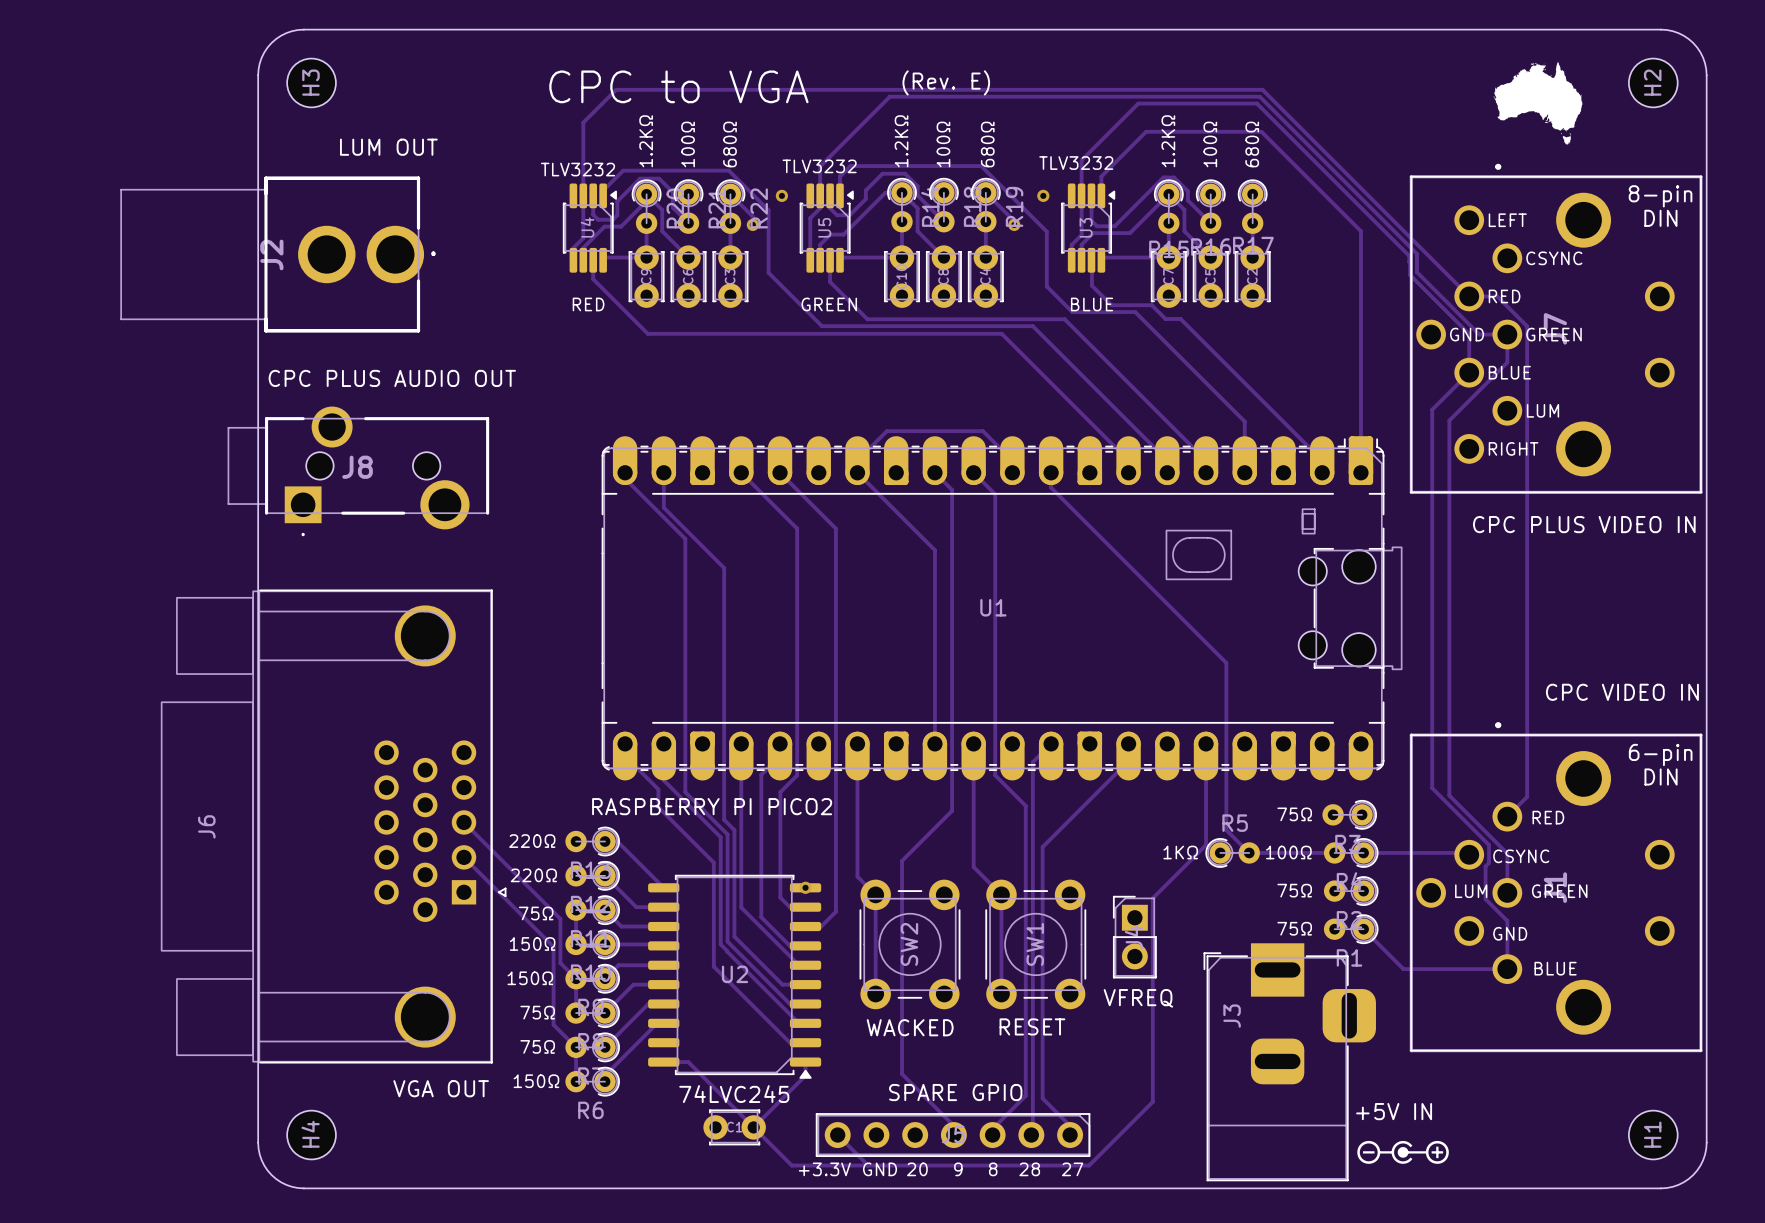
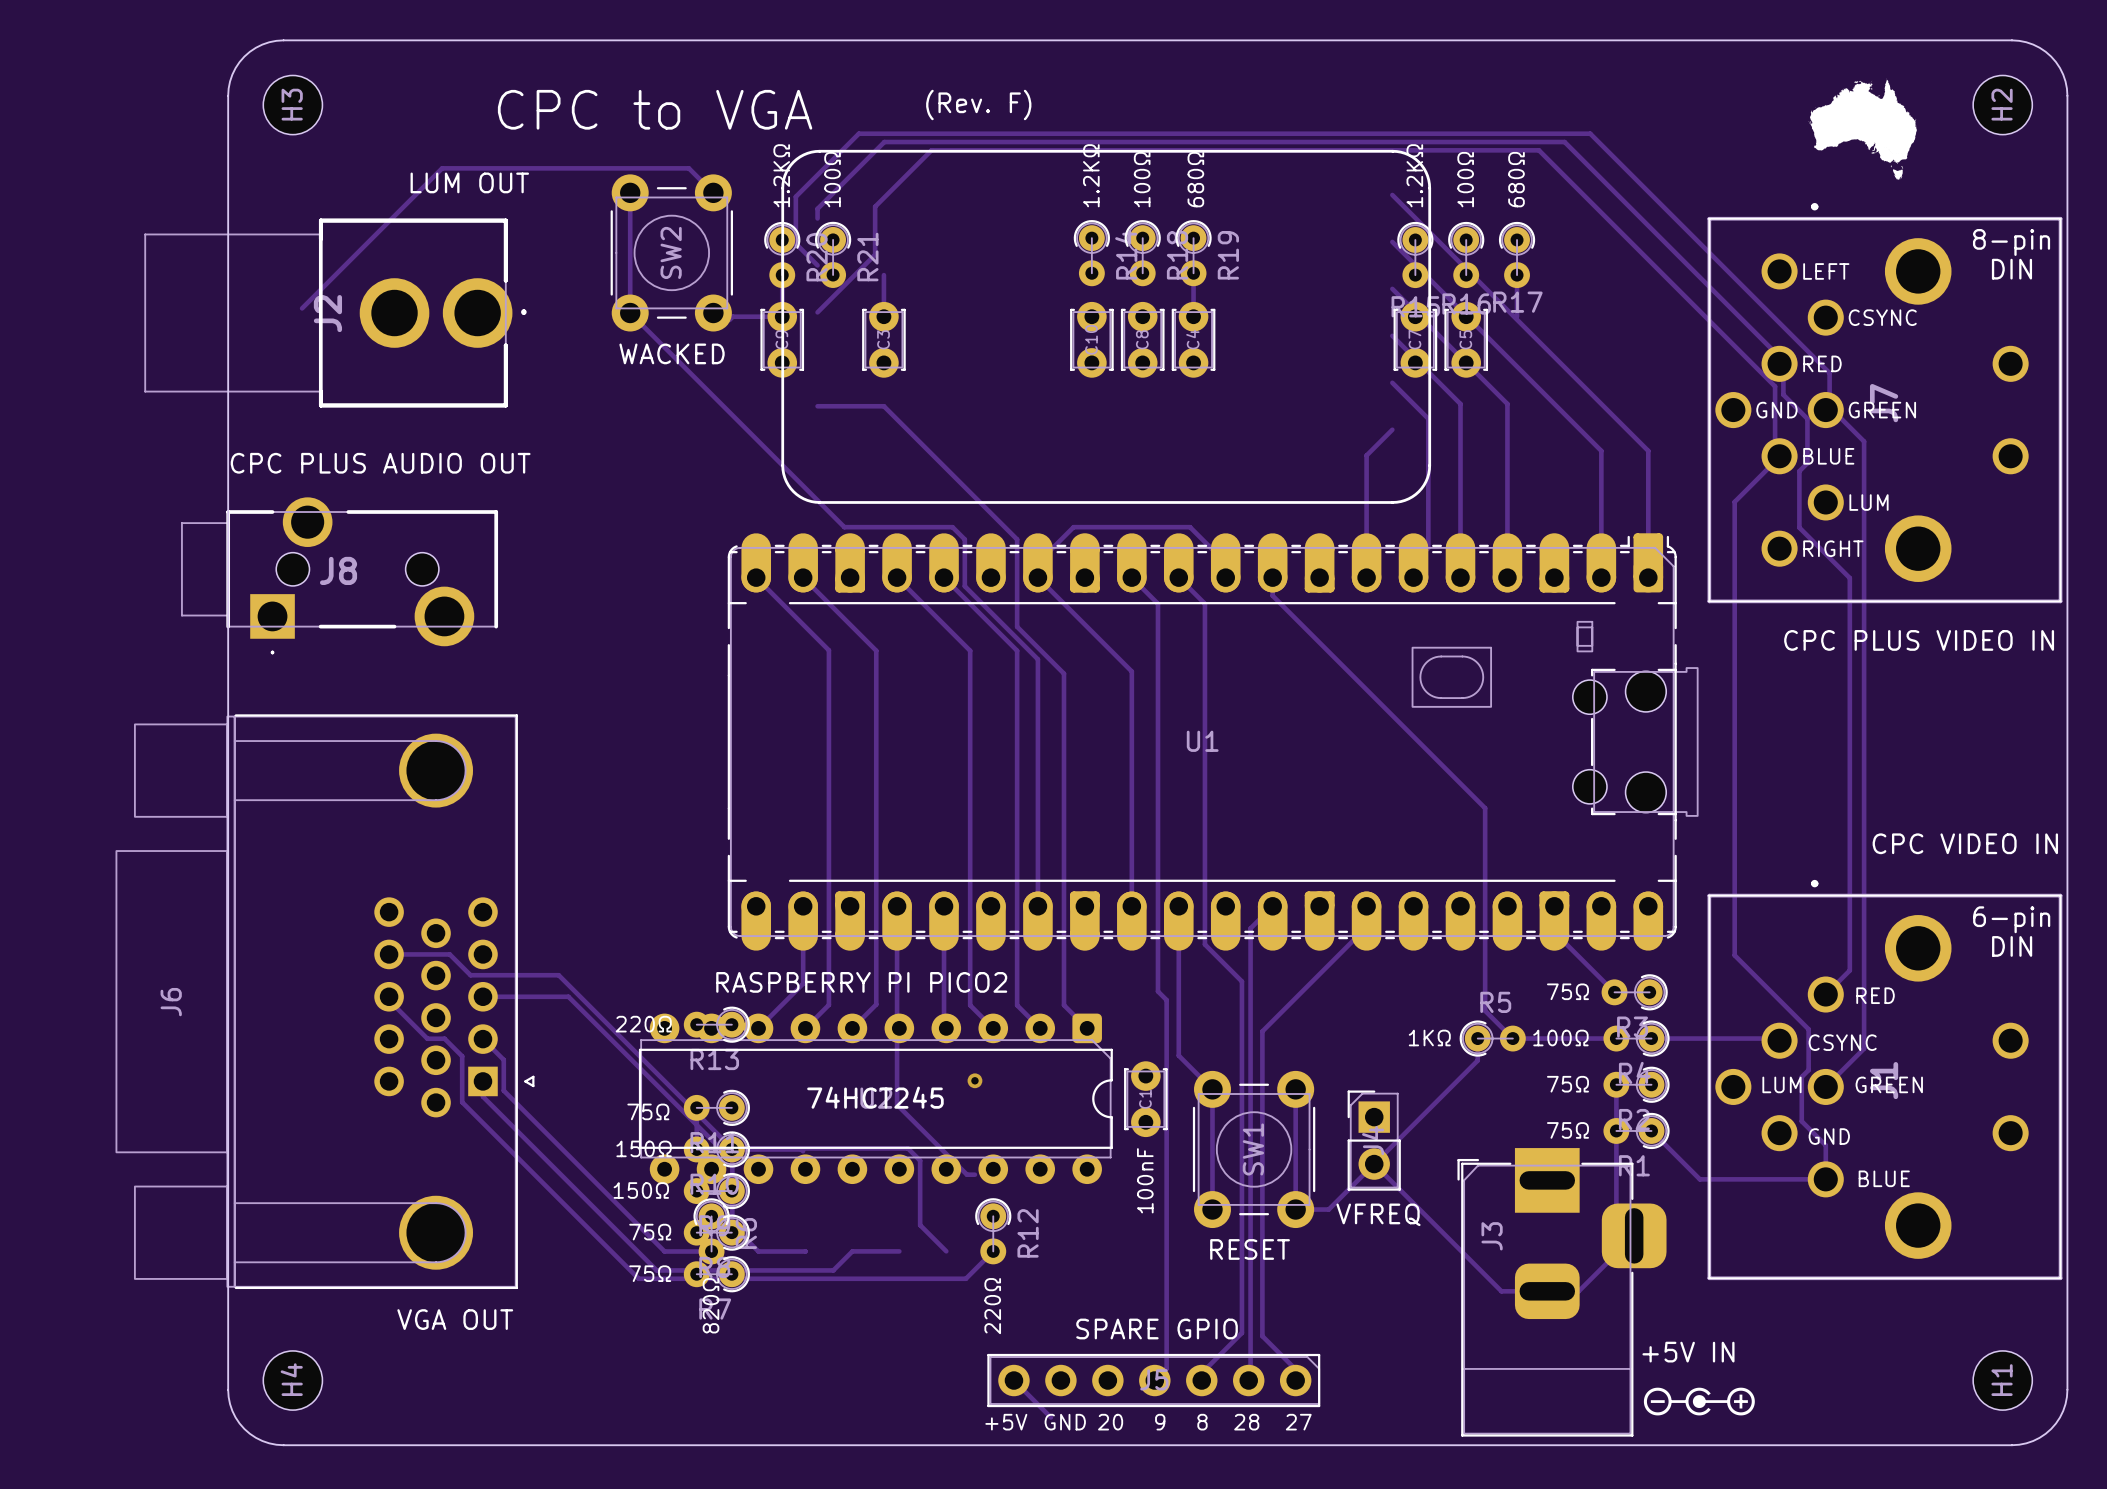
board edge: (303, 29) (286, 33) (271, 43) (261, 57) (258, 75) (258, 1142) (261, 1160) (271, 1175) (286, 1184) (303, 1188) -> (366, 40) (283, 40) (262, 44) (249, 51) (235, 68) (230, 81) (228, 95) (228, 1397) (232, 1410) (239, 1423) (249, 1433) (262, 1441) (283, 1445) (366, 1445)
H3 position: (311, 82) -> (292, 105)
text: none -> (Rev. F) (978, 104)
text: (Rev. E) (946, 82) -> none
text position: CPC to VGA (678, 86) -> CPC to VGA (655, 109)
line: none -> (819, 151) (1392, 151) (1408, 154) (1424, 168) (1429, 188) (1429, 465) (1426, 481) (1412, 496) (1392, 502) (819, 502) (803, 498) (790, 488) (782, 469) (782, 188) (786, 172) (793, 162) (807, 153) (819, 151)
track: none -> (713, 192) (688, 168) (442, 168) (302, 308)
track: (985, 192) (1014, 221) (1014, 224) -> none
track: (730, 194) (752, 216) (752, 224) -> none
track: (593, 195) (593, 214) (598, 219) (612, 219) (617, 215) (617, 201) (640, 178) (659, 178) (672, 192) (672, 207) (688, 223) -> none
track: (603, 195) (603, 190) (623, 170) (728, 170) (768, 210) (768, 272) (821, 326) (1032, 326) (1167, 460) -> (1392, 382) (1428, 418) (1428, 548) (1413, 562)
via: (781, 195) -> none
track: (840, 195) (840, 176) (850, 166) (981, 166) (1046, 231) (1046, 286) (1072, 312) (1135, 312) (1244, 421) -> (1392, 288) (1507, 403) (1507, 515)
via: (1043, 195) -> none
track: (1091, 195) (1091, 220) (1096, 226) (1114, 226) (1163, 177) (1174, 177) (1187, 191) (1187, 200) (1210, 223) -> none
track: (1101, 195) (1101, 176) (1146, 131) (1261, 131) (1360, 231) (1360, 368) -> (1392, 194) (1648, 450)
track: (830, 196) (830, 208) (837, 215) (849, 215) (865, 199) (865, 190) (882, 173) (905, 173) (917, 186) (917, 195) (943, 221) -> none
R22: 680Ω (730, 206) -> none
track: (901, 221) (901, 257) (842, 257) (840, 260) -> none
track: (1168, 223) (1168, 257) (1104, 257) (1101, 260) -> none
via: (752, 224) -> none
via: (1014, 224) -> none
U4: TLV3232 (589, 228) -> none
U5: TLV3232 (826, 228) -> none
U3: TLV3232 (1088, 228) -> none
track: (688, 257) (662, 231) (662, 209) (646, 194) (646, 201) (621, 226) (604, 226) (583, 247) (583, 266) -> none
track: (943, 257) (917, 231) (917, 208) (901, 192) (885, 192) (843, 234) (830, 234) (820, 244) (820, 260) -> none
track: (1210, 257) (1184, 231) (1184, 209) (1168, 194) (1129, 233) (1093, 233) (1081, 244) (1081, 260) -> none
track: (573, 260) (573, 248) (583, 238) (583, 122) (616, 89) (1262, 89) (1469, 296) (1497, 296) (1527, 326) (1527, 473) -> (817, 218) (817, 208) (884, 142) (1564, 142) (1783, 360) (1783, 394) (1807, 418) (1807, 463) (1799, 471) (1799, 527) (1849, 578)
track: (593, 260) (593, 279) (647, 333) (1001, 333) (1128, 460) -> (1392, 429) (1366, 455) (1366, 562)
track: (810, 260) (810, 218) (820, 208) (820, 166) (889, 96) (1259, 96) (1416, 253) (1416, 272) (1479, 334) (1507, 334) (1507, 362) (1449, 420) (1449, 795) (1507, 853) (1507, 892) -> (817, 265) (795, 243) (795, 196) (858, 133) (1590, 133) (1829, 373) (1829, 407) (1864, 441) (1864, 1048) (1825, 1086)
track: (830, 260) (830, 281) (867, 319) (1064, 319) (1206, 460) -> (1392, 335) (1460, 403) (1460, 562)
track: (1071, 260) (1071, 244) (1081, 235) (1081, 160) (1138, 103) (1256, 103) (1409, 255) (1410, 275) (1469, 334) (1469, 372) (1432, 410) -> (817, 312) (875, 254) (875, 206) (931, 150) (1538, 150) (1775, 386) (1775, 444) (1783, 453) (1734, 501)
track: (1091, 260) (1091, 285) (1111, 305) (1151, 305) (1165, 319) (1180, 319) (1322, 460) -> (1392, 241) (1601, 450) (1601, 562)
C6: (688, 276) -> none
C2: (1252, 276) -> none
text: RED (588, 304) -> none
text: GREEN (829, 304) -> none
text: BLUE (1092, 304) -> none
track: none -> (817, 406) (883, 406) (1017, 539) (1017, 626) (1063, 673) (1063, 1005) (1087, 1028)
J8 position: (358, 471) -> (339, 575)
track: none -> (756, 577) (828, 650) (828, 1004) (805, 1028)
track: (663, 472) (663, 507) (724, 568) -> (803, 577) (876, 650) (876, 693)
track: (625, 478) (685, 538) (685, 792) (727, 834) (727, 941) (789, 1003) (805, 1003) -> none
track: (952, 489) (952, 810) (902, 860) (902, 1074) (955, 1127) -> (1152, 598) (1157, 603) (1157, 991) (1166, 1000) (1166, 1368) (1154, 1380)
track: (797, 528) (797, 775) (780, 792) (780, 897) (789, 907) (805, 907) -> (964, 645) (970, 650) (970, 1005) (993, 1028)
track: (835, 528) (835, 911) (821, 926) (805, 926) -> (1011, 645) (1017, 650) (1017, 1005) (1040, 1028)
track: none -> (944, 906) (944, 1026) (946, 1028)
track: (1206, 743) (1206, 845) (1152, 898) (1152, 1101) (1089, 1165) (791, 1165) (688, 1062) (663, 1062) -> none
track: none -> (1554, 906) (1554, 932) (1614, 992)
track: (625, 756) (658, 789) (658, 807) (713, 862) (713, 966) (789, 1042) (805, 1042) -> none
track: (780, 756) (761, 774) (761, 917) (789, 945) (805, 945) -> none
track: (857, 756) (857, 876) (875, 894) (875, 994) -> (1037, 921) (1037, 659) (964, 586) (964, 539) (952, 527) (844, 527) (630, 313) (630, 192)
track: (663, 780) (720, 837) (720, 944) (798, 1023) (805, 1023) -> (803, 950) (803, 983) (758, 1028)
track: none -> (389, 954) (449, 954) (470, 975) (558, 975) (731, 1148) (907, 1148) (920, 1160) (920, 1225) (946, 1251)
track: (1432, 784) (1432, 788) (1489, 845) (1489, 862) (1485, 866) (1485, 899) (1507, 920) (1507, 941) -> (1734, 955) (1808, 1029) (1808, 1070) (1801, 1076) (1801, 1121) (1825, 1145)
track: none -> (389, 996) (389, 1000) (427, 1038) (444, 1038) (462, 1056) (462, 1102) (638, 1278) (965, 1278) (993, 1251)
track: none -> (482, 996) (568, 996) (732, 1160) (732, 1225) (758, 1251) (805, 1251)
track: (724, 819) (734, 830) (734, 936) (782, 984) (805, 984) -> (876, 998) (876, 1004) (852, 1028)
track: (464, 822) (560, 918) (560, 963) (576, 978) (576, 1013) -> none
J6 position: (333, 826) -> (324, 1001)
track: (605, 841) (617, 841) (663, 887) -> none
track: none -> (1477, 1038) (1477, 1060) (1328, 1209) (1295, 1209) (1295, 1089)
track: none -> (482, 1039) (503, 1059) (503, 1090) (664, 1251) (711, 1251)
track: (464, 857) (553, 946) (553, 1024) (576, 1047) (576, 1081) -> none
U2 footprint: [648, 874, 822, 1079] -> [638, 1013, 1113, 1185]
R12 rotation: 0° (592, 875) -> 90° counterclockwise (993, 1231)
R12 position: (592, 875) -> (993, 1231)
track: (605, 875) (636, 907) (663, 907) -> none
track: none -> (482, 1081) (482, 1096) (656, 1270) (833, 1270) (852, 1251) (899, 1251)
track: none -> (1616, 1084) (1616, 1218) (1634, 1235) (1578, 1291) (1501, 1291) (1374, 1164)
track: (605, 910) (621, 926) (663, 926) -> none
SW2 position: (909, 944) -> (671, 252)
track: (663, 965) (618, 965) (605, 978) -> none
C1 value: none -> 100nF (1145, 1180)
track: (663, 984) (633, 984) (605, 1013) -> none
track: (663, 1003) (648, 1003) (605, 1047) -> none
track: (663, 1023) (657, 1023) (605, 1075) (605, 1081) -> none
track: (805, 1062) (805, 1075) (753, 1127) -> none
R6 value: 150Ω (536, 1081) -> 820Ω (710, 1305)
R6 rotation: 0° (592, 1081) -> 90° counterclockwise (711, 1231)
R6 position: (592, 1081) -> (711, 1231)
U2 value: 74LVC245 (734, 1094) -> 74HCT245 (875, 1097)
C1 rotation: 0° (734, 1127) -> 90° clockwise (1145, 1099)
C1 position: (734, 1127) -> (1145, 1099)
H4 position: (311, 1135) -> (292, 1380)
text: +3.3V (824, 1169) -> none
text: none -> +5V (1006, 1422)

